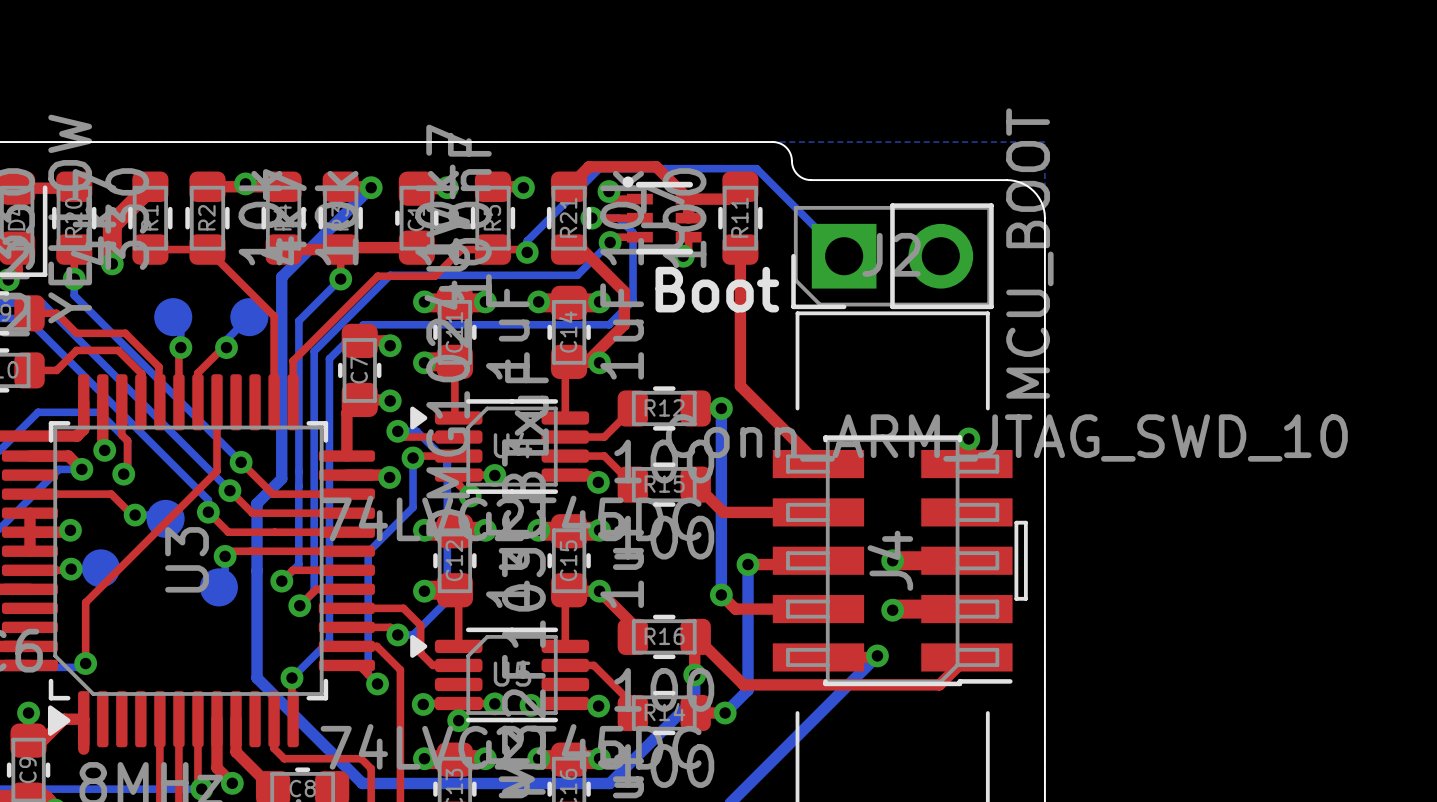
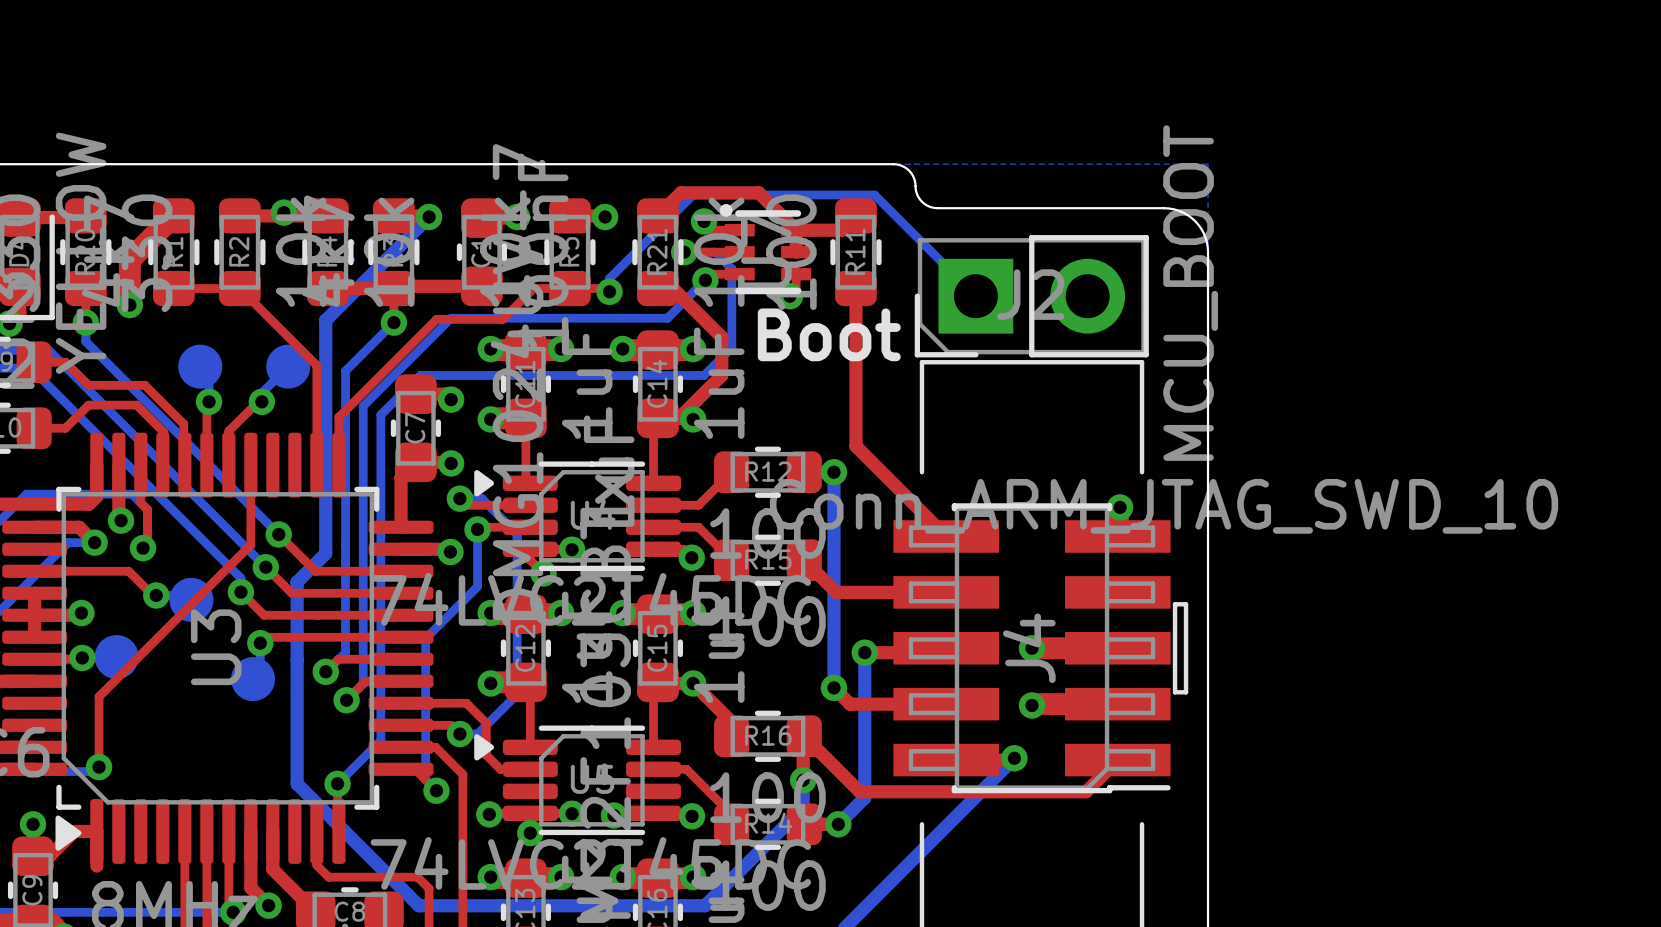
bottom track: (22, 427) (38, 412) (98, 412) (114, 427) -> (26, 494) (132, 494)

